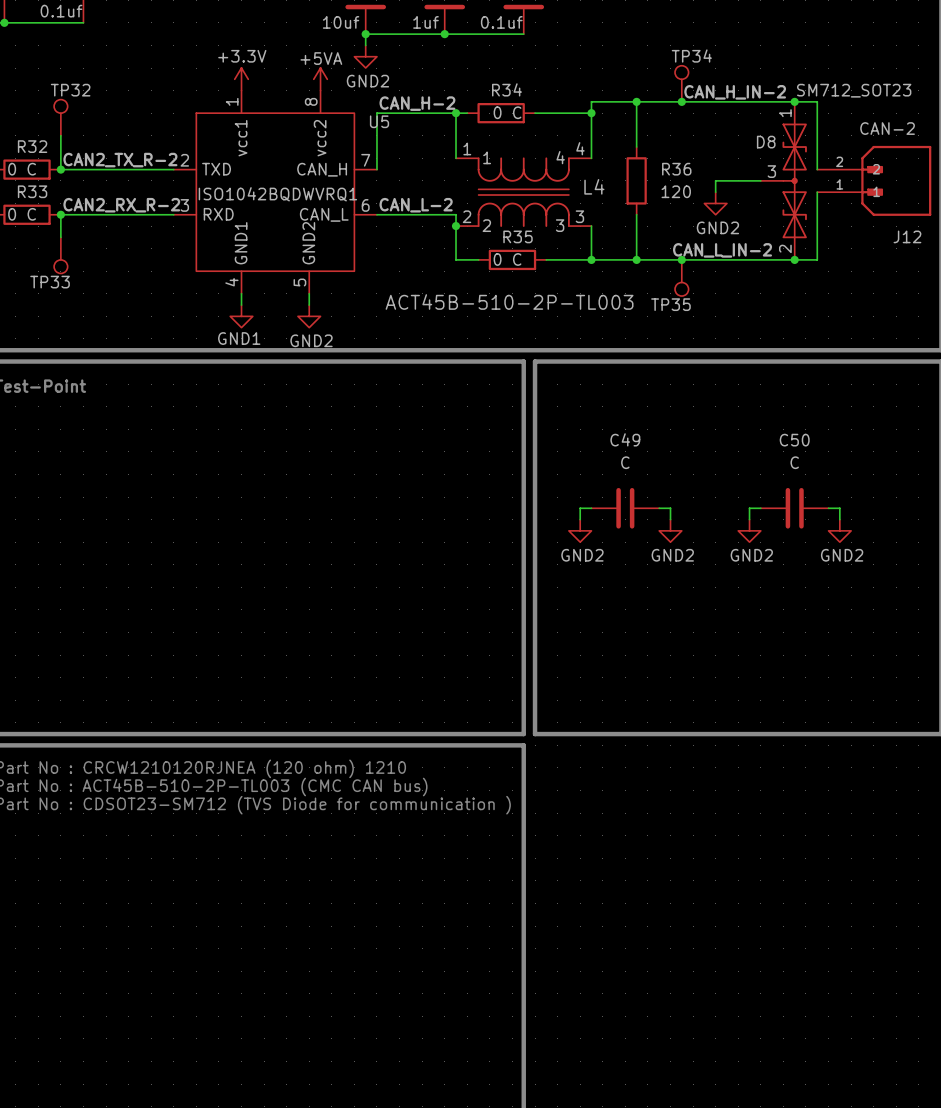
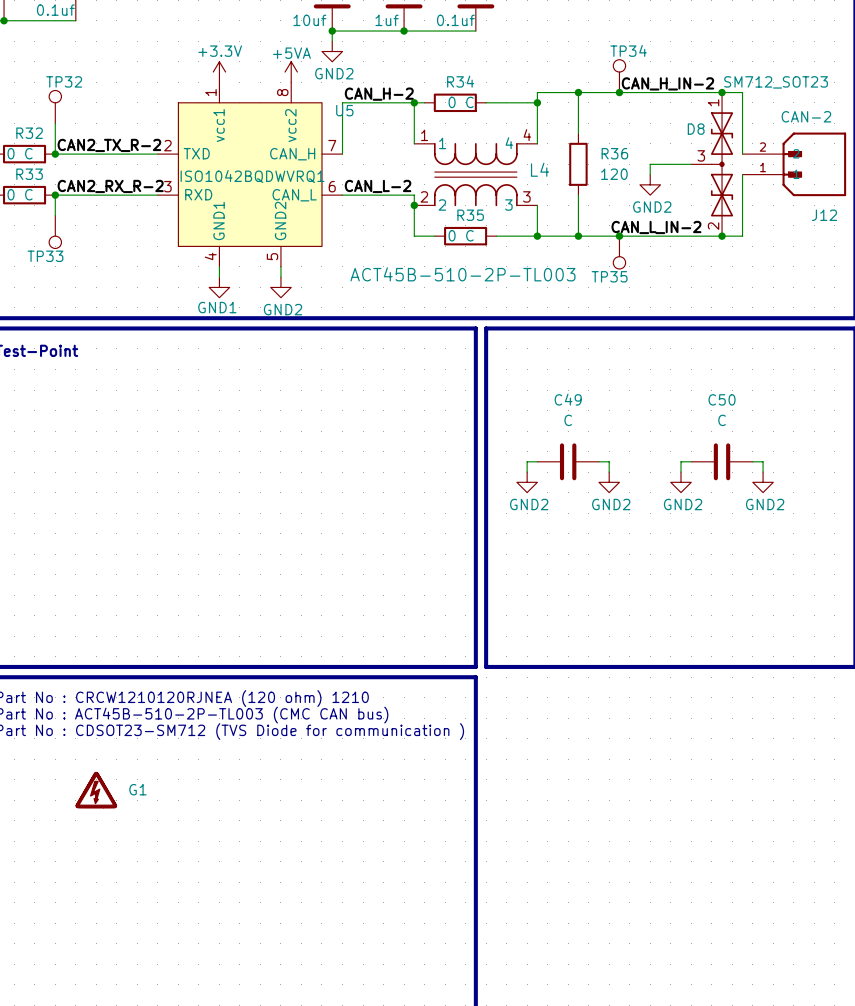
G1: none -> (96, 790)

